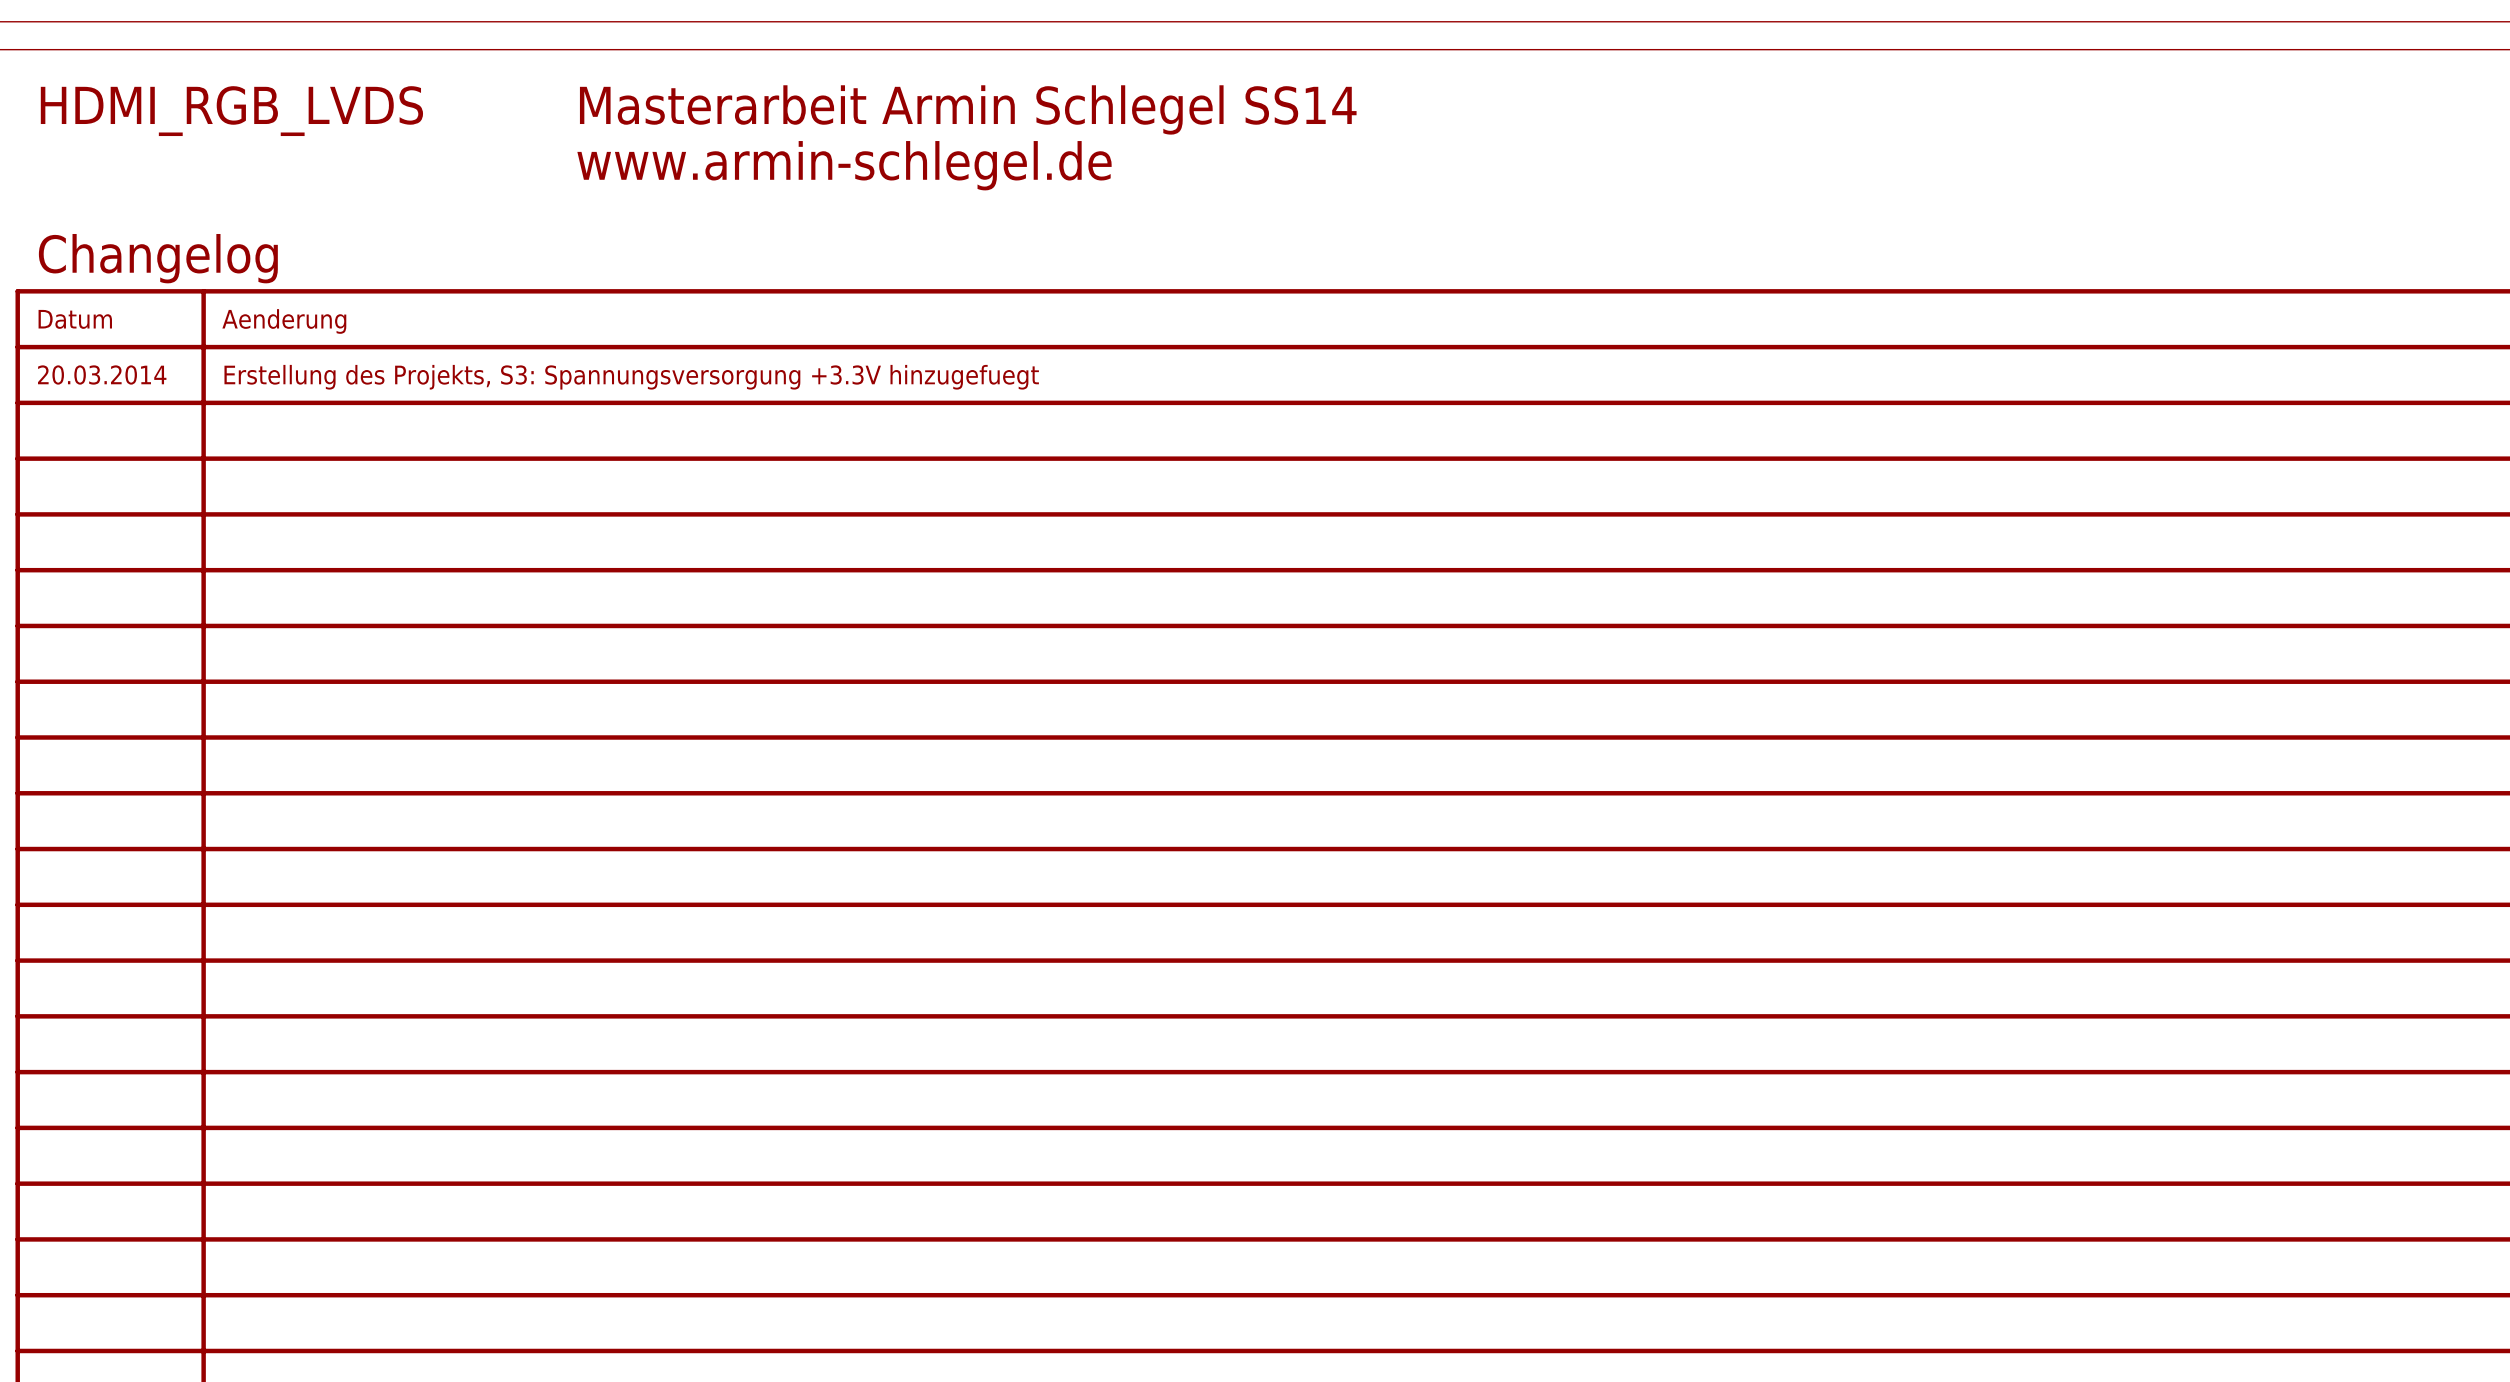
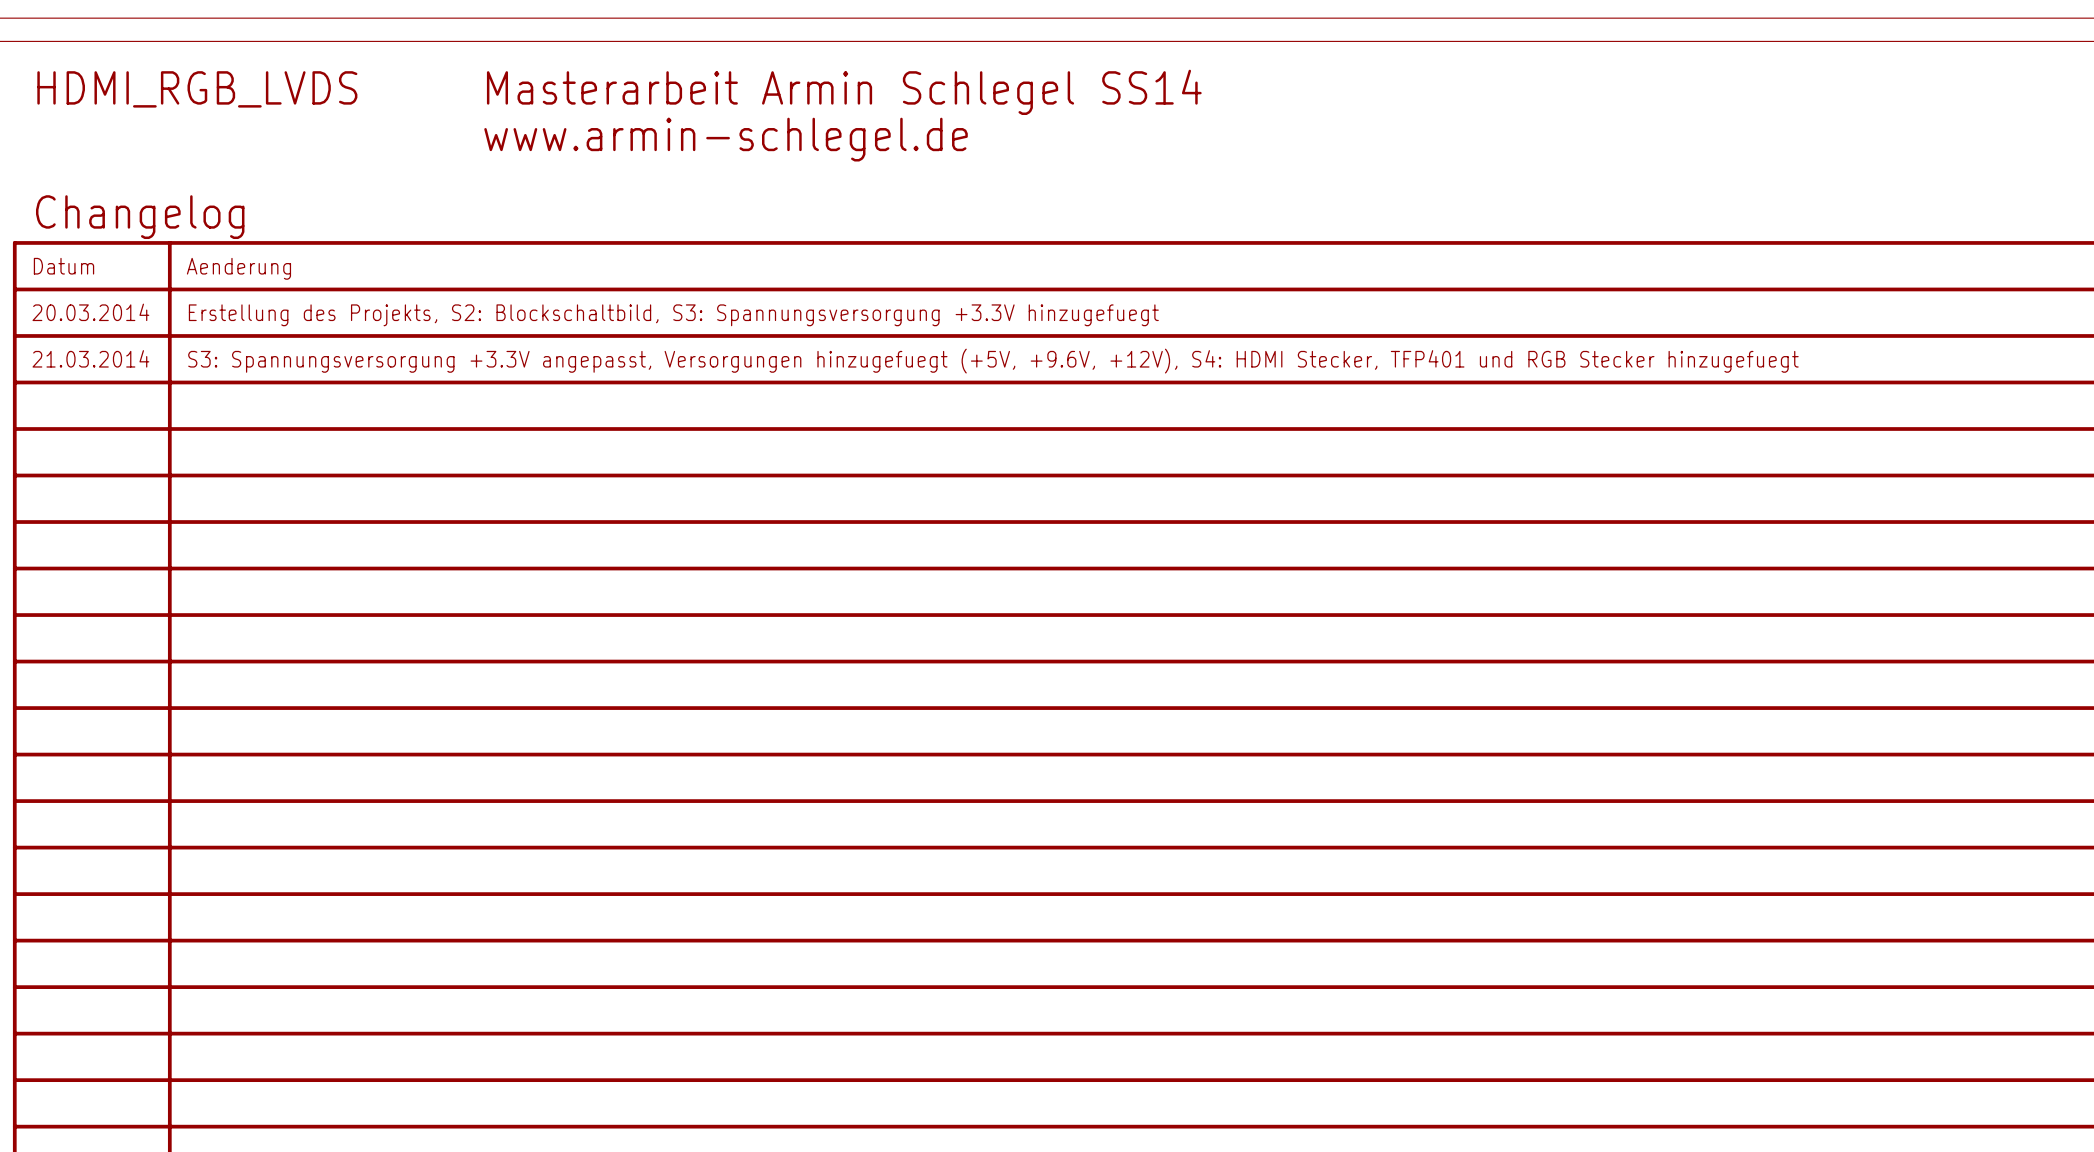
text: Erstellung des Projekts, S3: Spannungsversorgung +3.3V hinzugefuegt (631, 377) -> Erstellung des Projekts, S2: Blockschaltbild, S3: Spannungsversorgung +3.3V hinzugefuegt (673, 315)
text: none -> 21.03.2014 (90, 358)
text: none -> S3: Spannungsversorgung +3.3V angepasst, Versorgungen hinzugefuegt (+5V, +9.6V, +12V), S4: HDMI Stecker, TFP401 und RGB Stecker hinzugefuegt (993, 361)

